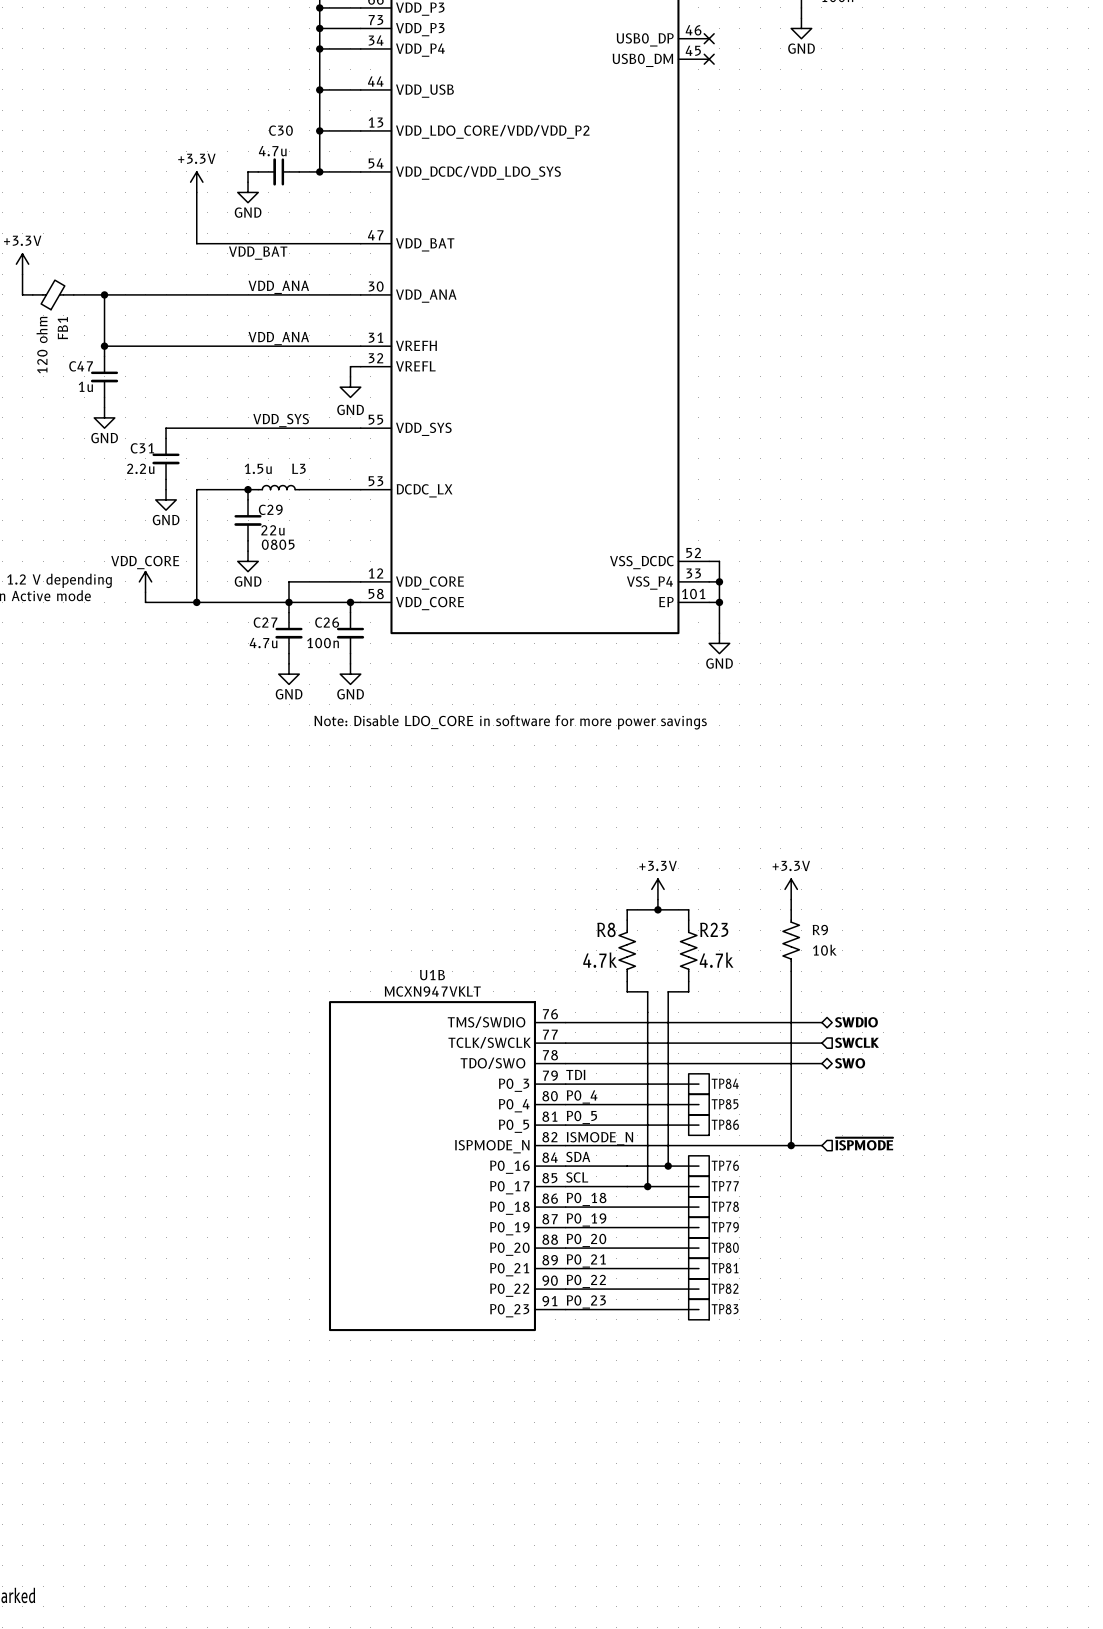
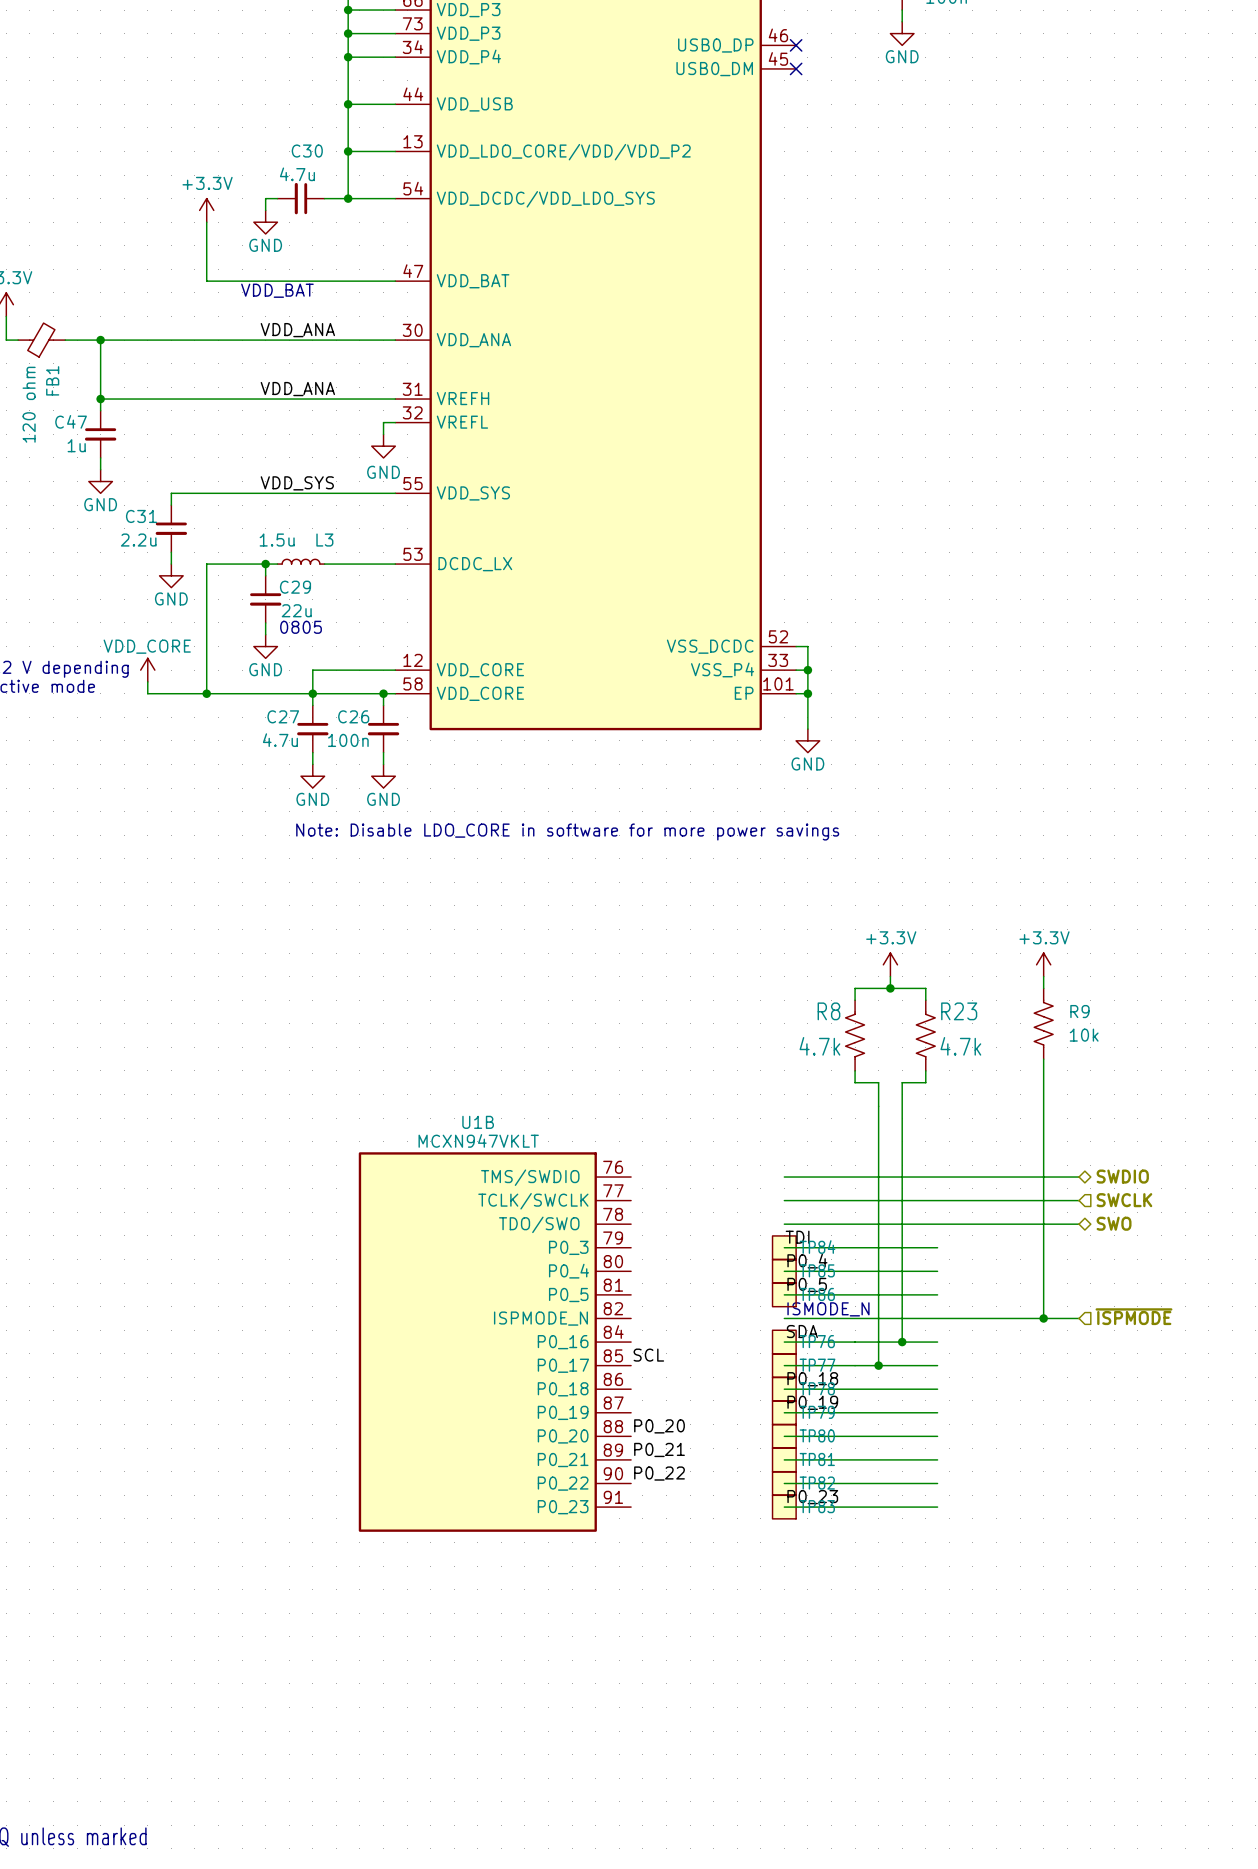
power symbol: none -> +3.3V (1043, 964)
junction: none -> (890, 988)
power symbol: +3.3V (657, 889) -> none
power symbol position: +3.3V (791, 889) -> +3.3V (890, 964)
wire: (657, 899) (657, 909) -> (890, 976) (890, 988)
wire: (791, 899) (791, 909) -> (1043, 976) (1043, 988)
junction: (657, 909) -> none
wire: (627, 920) (627, 909) (688, 909) (688, 920) -> (855, 1000) (855, 988) (925, 988) (925, 1000)
wire: none -> (1043, 1059) (1043, 1318)
wire: none -> (855, 1070) (855, 1082) (878, 1082) (878, 1365)
wire: none -> (925, 1070) (925, 1082) (902, 1082) (902, 1342)
R9 position: (791, 940) -> (1043, 1023)
R8 position: (627, 950) -> (855, 1035)
R23 position: (688, 950) -> (925, 1035)
wire: (791, 971) (791, 1145) -> none
wire: (627, 981) (627, 991) (647, 991) (647, 1186) -> none
wire: (688, 981) (688, 991) (668, 991) (668, 1166) -> none
wire: (565, 1022) (698, 1022) -> none
wire: none -> (925, 1177) (1079, 1177)
hierarchical label position: SWDIO (856, 1022) -> SWDIO (1122, 1176)
hierarchical label position: SWCLK (857, 1042) -> SWCLK (1124, 1200)
wire: (565, 1043) (698, 1043) -> none
wire: none -> (925, 1200) (1079, 1200)
wire: (565, 1063) (698, 1063) -> none
wire: none -> (925, 1224) (1079, 1224)
hierarchical label position: SWO (850, 1063) -> SWO (1114, 1223)
label position: TDI (575, 1074) -> TDI (797, 1237)
wire: (565, 1084) (698, 1084) -> (937, 1247) (784, 1247)
label position: P0_4 (582, 1096) -> P0_4 (807, 1261)
wire: (565, 1104) (698, 1104) -> (937, 1271) (784, 1271)
label position: P0_5 (581, 1117) -> P0_5 (807, 1284)
wire: (565, 1125) (698, 1125) -> (937, 1294) (784, 1294)
text position: ISMODE_N (599, 1138) -> ISMODE_N (828, 1309)
hierarchical label position: ~{ISPMODE} (864, 1144) -> ~{ISPMODE} (1133, 1316)
wire: (565, 1145) (698, 1145) -> none
junction: (791, 1145) -> none
wire: none -> (925, 1318) (1079, 1318)
junction: none -> (1043, 1318)
label position: SDA (578, 1156) -> SDA (802, 1331)
wire: (565, 1166) (698, 1166) -> (937, 1342) (784, 1342)
junction: (668, 1166) -> none
junction: none -> (902, 1342)
wire: (565, 1186) (698, 1186) -> (937, 1365) (784, 1365)
junction: (647, 1186) -> none
junction: none -> (878, 1365)
label position: P0_18 (586, 1199) -> P0_18 (812, 1379)
wire: (565, 1207) (698, 1207) -> (937, 1389) (784, 1389)
label position: P0_19 (586, 1219) -> P0_19 (812, 1402)
wire: (565, 1227) (698, 1227) -> (937, 1412) (784, 1412)
wire: (565, 1248) (698, 1248) -> (937, 1436) (784, 1436)
wire: (565, 1268) (698, 1268) -> (937, 1459) (784, 1459)
wire: (565, 1289) (698, 1289) -> (937, 1483) (784, 1483)
label position: P0_23 (586, 1301) -> P0_23 (812, 1497)
wire: (565, 1309) (698, 1309) -> (937, 1507) (784, 1507)

